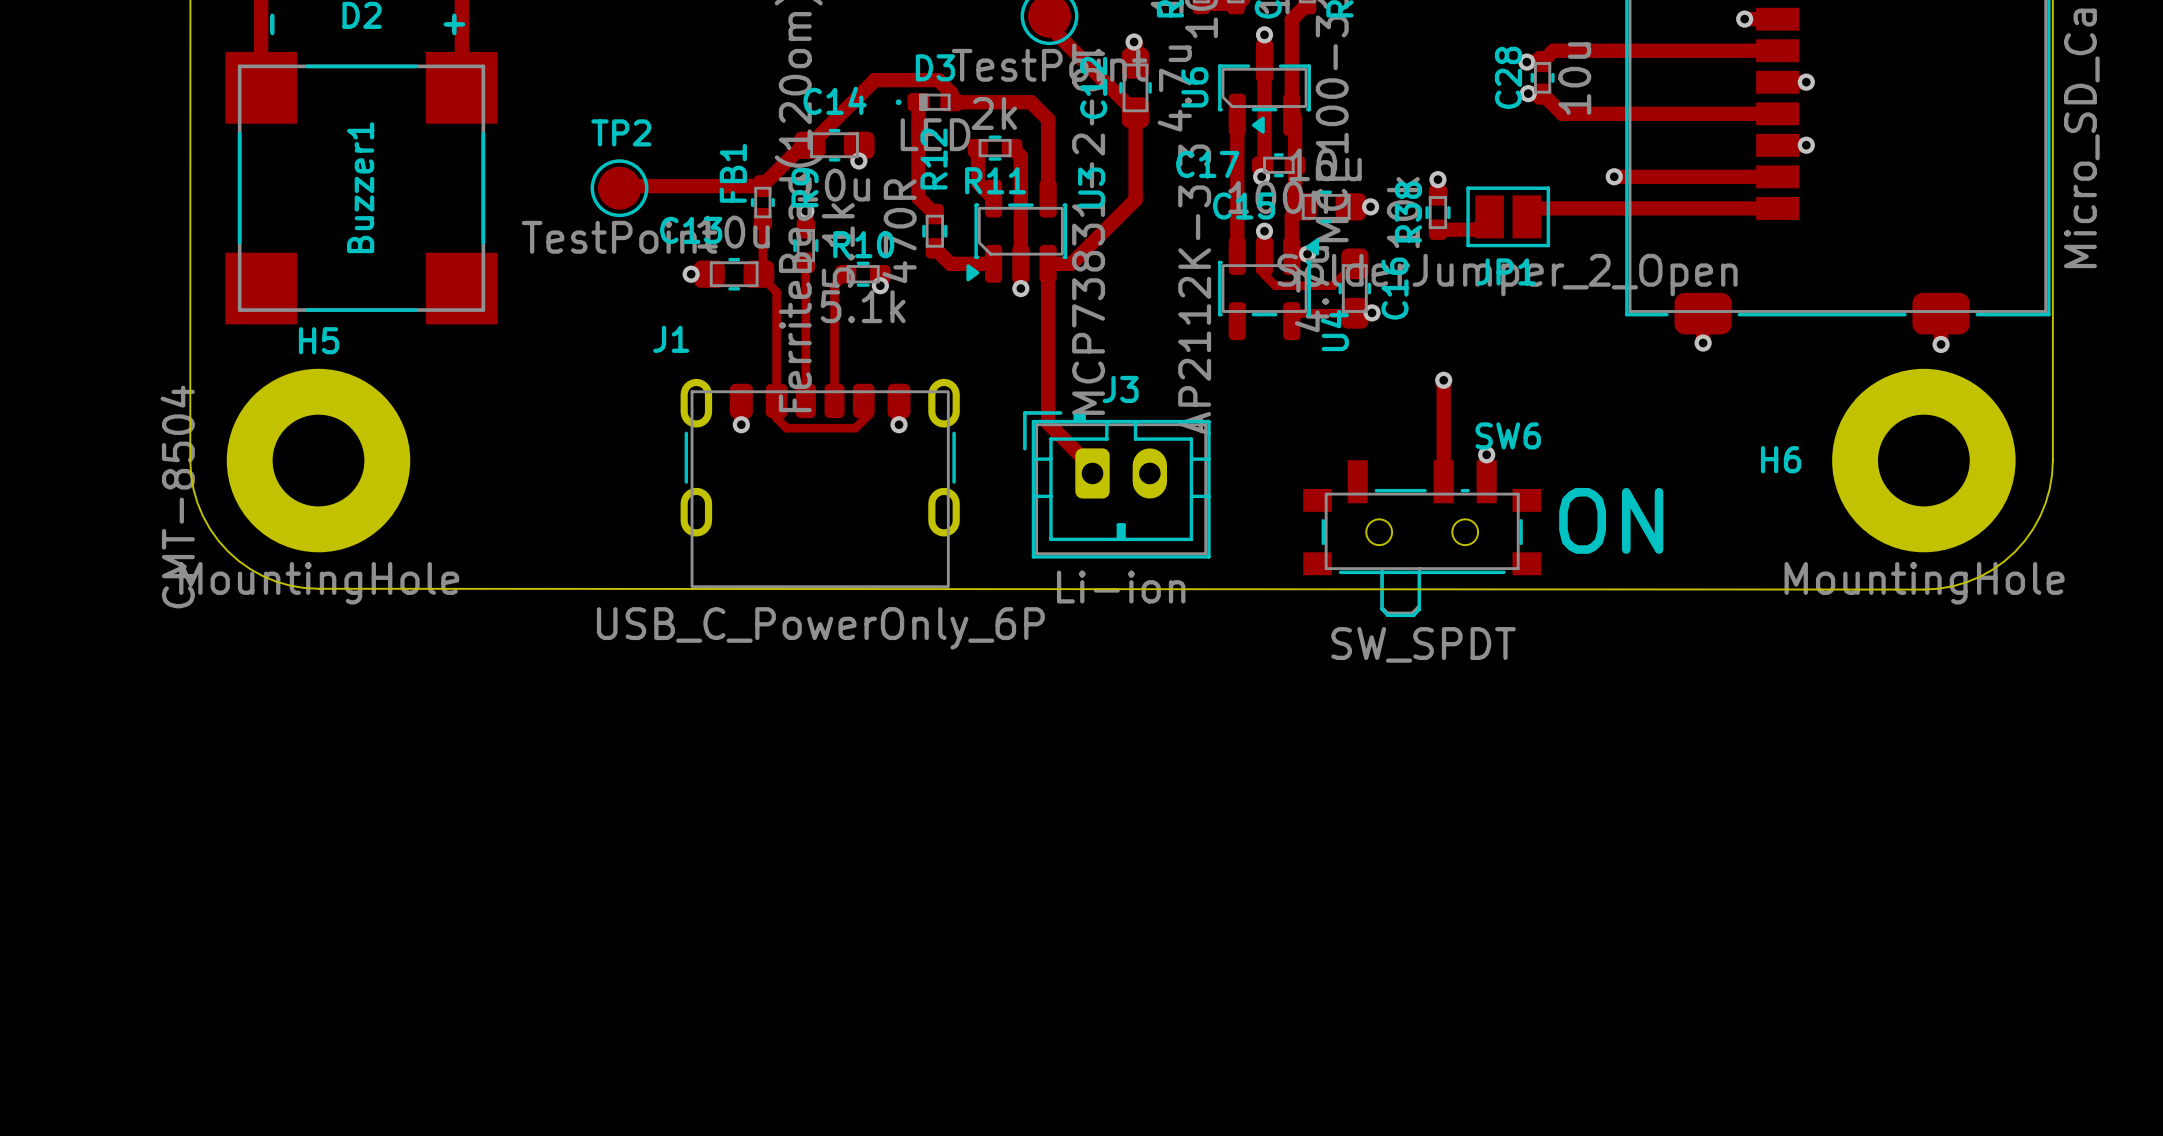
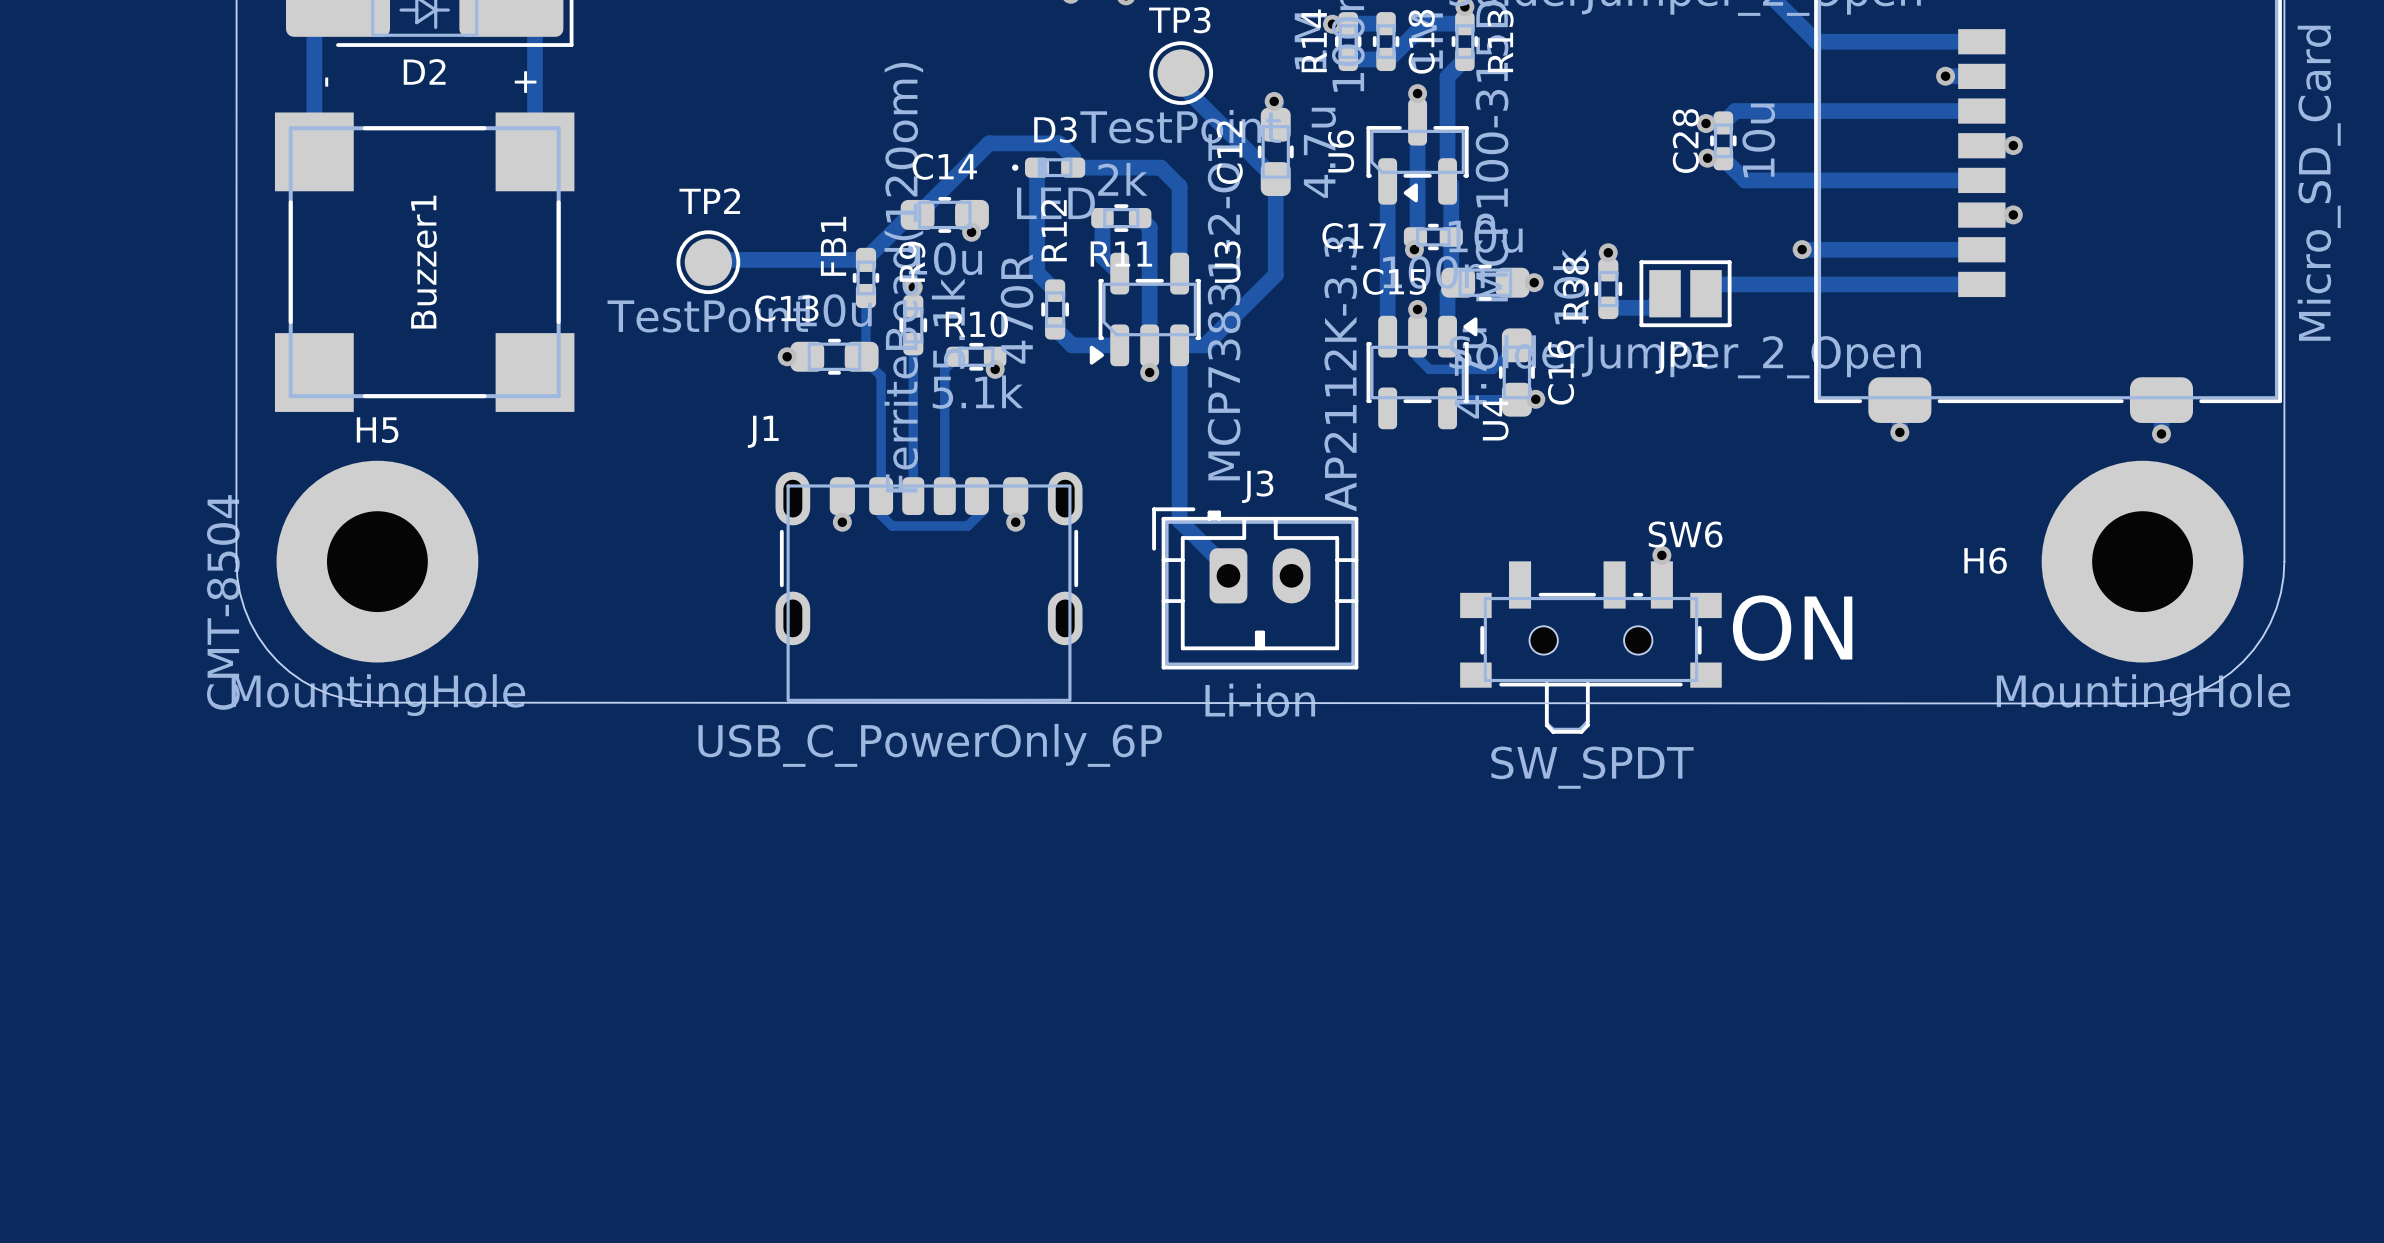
via: (1307, 254) -> none
track: (1443, 380) (1443, 481) -> none
via: (1443, 380) -> none

